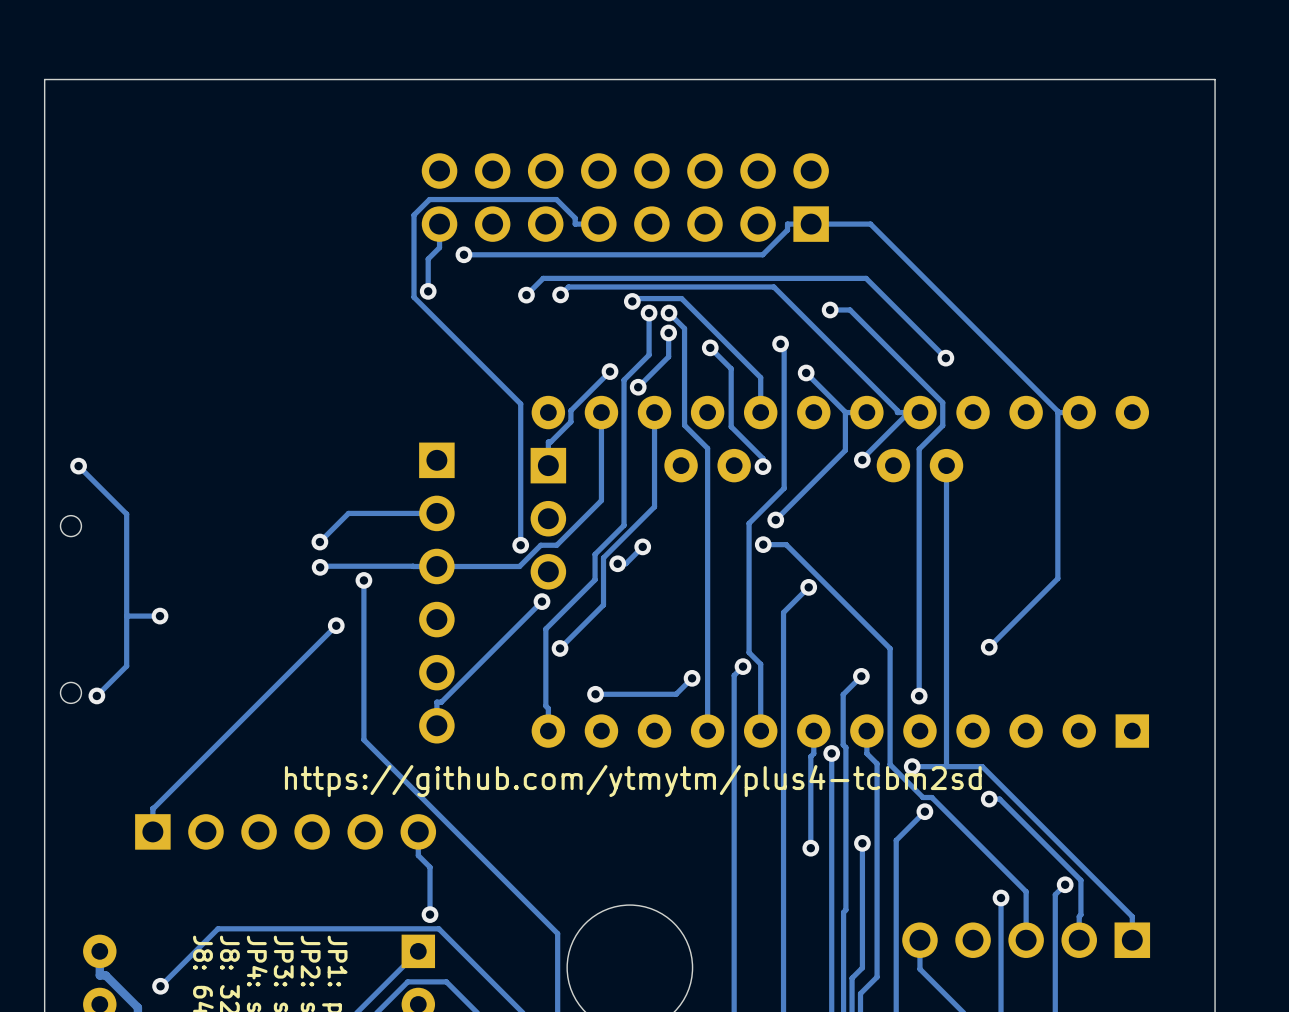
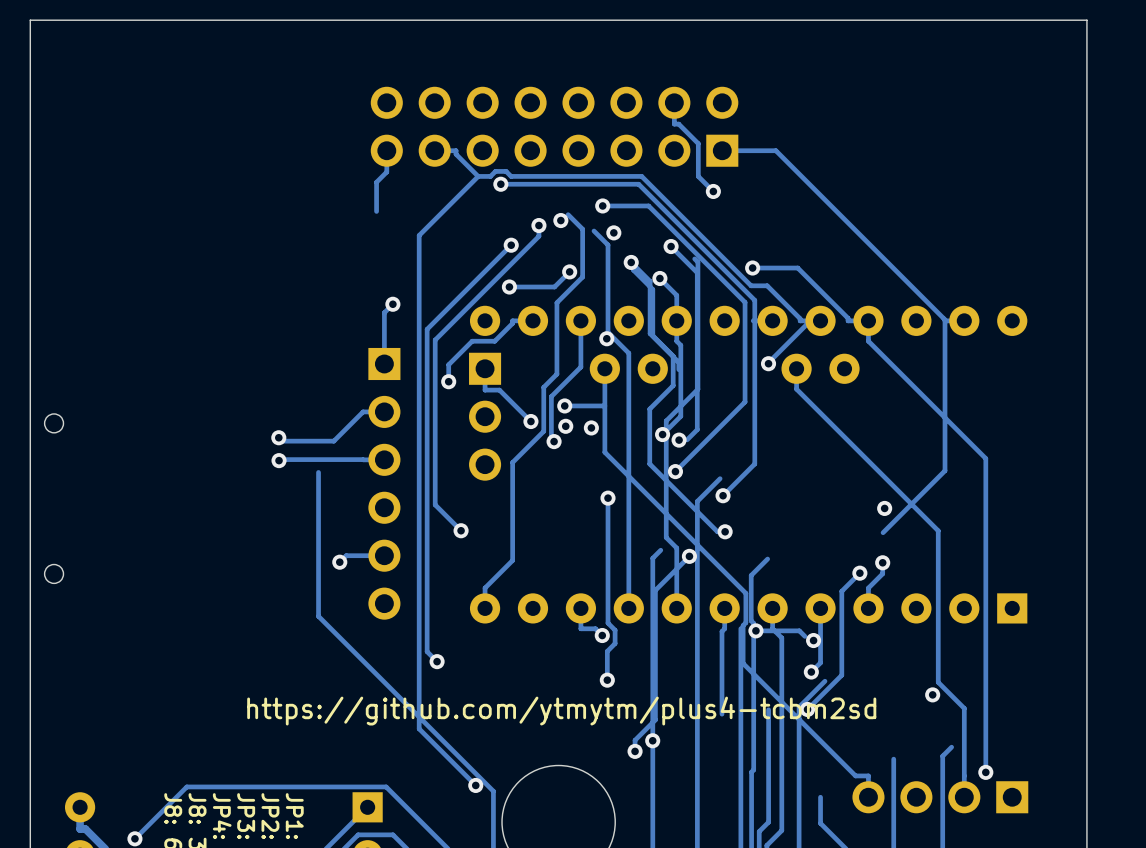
track: none -> (674, 102) (674, 124) (678, 124) (698, 143) (698, 176) (713, 191)
track: none -> (434, 150) (456, 150) (456, 154) (478, 176)
track: (598, 224) (575, 224) (575, 218) (556, 199) (429, 199) (414, 215) (414, 297) (520, 403) (520, 545) -> none
track: (811, 224) (787, 224) (787, 229) (762, 254) (463, 254) -> none
track: none -> (478, 176) (419, 235) (419, 728) (475, 785)
via: (463, 254) -> none
track: none -> (500, 184) (638, 184) (754, 300) (754, 463) (723, 495)
via: none -> (500, 184)
via: none -> (713, 191)
track: none -> (602, 205) (648, 205) (745, 302) (745, 402) (675, 471)
via: none -> (602, 205)
via: (428, 291) -> none
track: (560, 294) (568, 286) (773, 286) (897, 410) -> (478, 176) (490, 176) (495, 171) (506, 171) (511, 176) (641, 176) (751, 285) (767, 285) (800, 318)
via: (560, 294) -> none
track: (526, 295) (543, 278) (866, 278) (945, 358) -> none
via: (526, 295) -> none
track: (632, 301) (635, 298) (681, 298) (760, 377) (760, 384) -> (659, 278) (676, 295)
track: none -> (538, 225) (538, 236) (435, 340) (435, 504) (461, 530)
via: none -> (538, 225)
track: (830, 309) (850, 309) (942, 402) (942, 425) (919, 449) (919, 696) -> none
via: (830, 309) -> none
track: (649, 313) (649, 354) (624, 380) (624, 525) (595, 554) (595, 579) (545, 629) (545, 705) (548, 708) -> (568, 214) (582, 229) (582, 277) (556, 302) (556, 374) (543, 387) (543, 431) (512, 462) (512, 560) (485, 588)
via: (649, 313) -> none
via: (669, 313) -> none
via: none -> (613, 232)
track: none -> (511, 245) (427, 329) (427, 651) (437, 661)
via: none -> (511, 245)
track: none -> (671, 246) (697, 272) (697, 429) (687, 439)
via: none -> (671, 246)
track: (668, 332) (668, 356) (638, 387) -> none
via: (668, 332) -> none
track: none -> (633, 258) (633, 270) (652, 289) (652, 335) (673, 356) (673, 385) (649, 409) (649, 464) (717, 531) (725, 531)
via: (780, 343) -> none
track: none -> (752, 268) (797, 268) (848, 318) (848, 320) (868, 320) (868, 341) (985, 458) (985, 772)
via: none -> (752, 268)
track: none -> (569, 271) (554, 287) (509, 287)
via: none -> (569, 271)
via: (945, 358) -> none
via: none -> (659, 278)
track: (610, 371) (570, 410) (570, 421) (550, 442) (548, 442) (548, 465) -> (530, 421) (499, 390) (485, 390) (485, 368)
via: (610, 371) -> none
track: (806, 372) (845, 412) (845, 450) (775, 519) -> none
via: (806, 372) -> none
via: none -> (509, 287)
via: (638, 387) -> none
track: none -> (392, 304) (384, 312) (384, 363)
via: none -> (392, 304)
track: (601, 412) (601, 500) (556, 545) (540, 545) (519, 566) (436, 566) -> (532, 320) (512, 320) (512, 323) (494, 341) (472, 341) (448, 364) (448, 381)
track: none -> (676, 320) (676, 341) (680, 345) (680, 416) (662, 434)
via: none -> (606, 338)
track: (654, 463) (654, 506) (603, 557) (603, 604) (560, 648) -> (580, 367) (551, 396) (551, 438) (554, 441)
track: none -> (604, 368) (604, 452) (745, 593) (743, 663) (855, 775) (868, 775) (868, 797)
track: (946, 465) (946, 766) -> none
track: (78, 466) (126, 514) (126, 666) (96, 695) -> none
via: (78, 466) -> none
via: (763, 466) -> none
via: none -> (448, 381)
via: none -> (564, 405)
track: none -> (604, 405) (564, 405)
track: (413, 513) (348, 513) (319, 542) -> (363, 411) (333, 441) (277, 441)
via: (775, 519) -> none
via: none -> (530, 421)
via: none -> (565, 426)
via: none -> (591, 427)
via: none -> (662, 434)
track: (763, 544) (786, 544) (890, 648) (890, 764) (923, 797) (931, 797) (1026, 891) (1026, 940) -> none
via: (520, 545) -> none
via: none -> (554, 441)
track: (642, 546) (625, 563) (617, 563) -> none
via: (642, 546) -> none
via: (617, 563) -> none
via: none -> (675, 471)
via: (363, 580) -> none
via position: (808, 587) -> (723, 495)
track: (541, 601) (441, 702) (436, 702) (436, 725) -> none
via: (541, 601) -> none
track: none -> (608, 498) (608, 623) (615, 630) (615, 643) (607, 651) (607, 680)
via: none -> (608, 498)
track: (160, 616) (126, 616) -> none
via: (160, 616) -> none
via: none -> (884, 508)
track: (336, 625) (152, 808) (152, 831) -> none
via: (336, 625) -> none
via: none -> (461, 530)
via: none -> (725, 531)
via: (989, 647) -> none
via: (560, 648) -> none
via position: (743, 666) -> (689, 556)
track: none -> (384, 555) (346, 555) (339, 562)
track: none -> (689, 556) (655, 590) (655, 719) (635, 740) (635, 751)
via: (861, 676) -> none
track: (692, 678) (676, 694) (595, 694) -> none
via: (692, 678) -> none
via: none -> (339, 562)
track: none -> (882, 562) (882, 573) (868, 588) (868, 608)
via: none -> (882, 562)
track: none -> (859, 573) (841, 591) (841, 675) (807, 709)
via: none -> (859, 573)
via: (595, 694) -> none
via: (96, 695) -> none
via: (919, 696) -> none
track: none -> (580, 608) (580, 628) (595, 628) (602, 635)
track: none -> (820, 608) (820, 662) (811, 672)
via position: (831, 753) -> (755, 630)
track: none -> (755, 630) (799, 630) (804, 636)
via: none -> (602, 635)
track: (912, 766) (982, 766) (1132, 916) (1132, 940) -> none
text position: https://github.com/ytmytm/plus4-tcbm2sd (633, 781) -> https://github.com/ytmytm/plus4-tcbm2sd (561, 711)
via: none -> (437, 661)
track: (989, 799) (999, 799) (1080, 880) (1080, 914) (1079, 916) -> (796, 368) (796, 389) (938, 530) (938, 682) (964, 708) (964, 775)
via: (989, 799) -> none
via: none -> (607, 680)
via position: (924, 811) -> (811, 672)
via: none -> (932, 694)
part: (285, 831) -> none
track: (418, 831) (418, 855) (430, 867) (430, 914) -> none
via: (862, 843) -> none
via: none -> (807, 709)
via: (810, 848) -> none
via: none -> (652, 740)
via: (1065, 884) -> none
via: none -> (635, 751)
via: (1001, 898) -> none
via: none -> (985, 772)
via: (430, 914) -> none
via: none -> (475, 785)
part: (1026, 940) -> none
part: none -> (940, 797)

